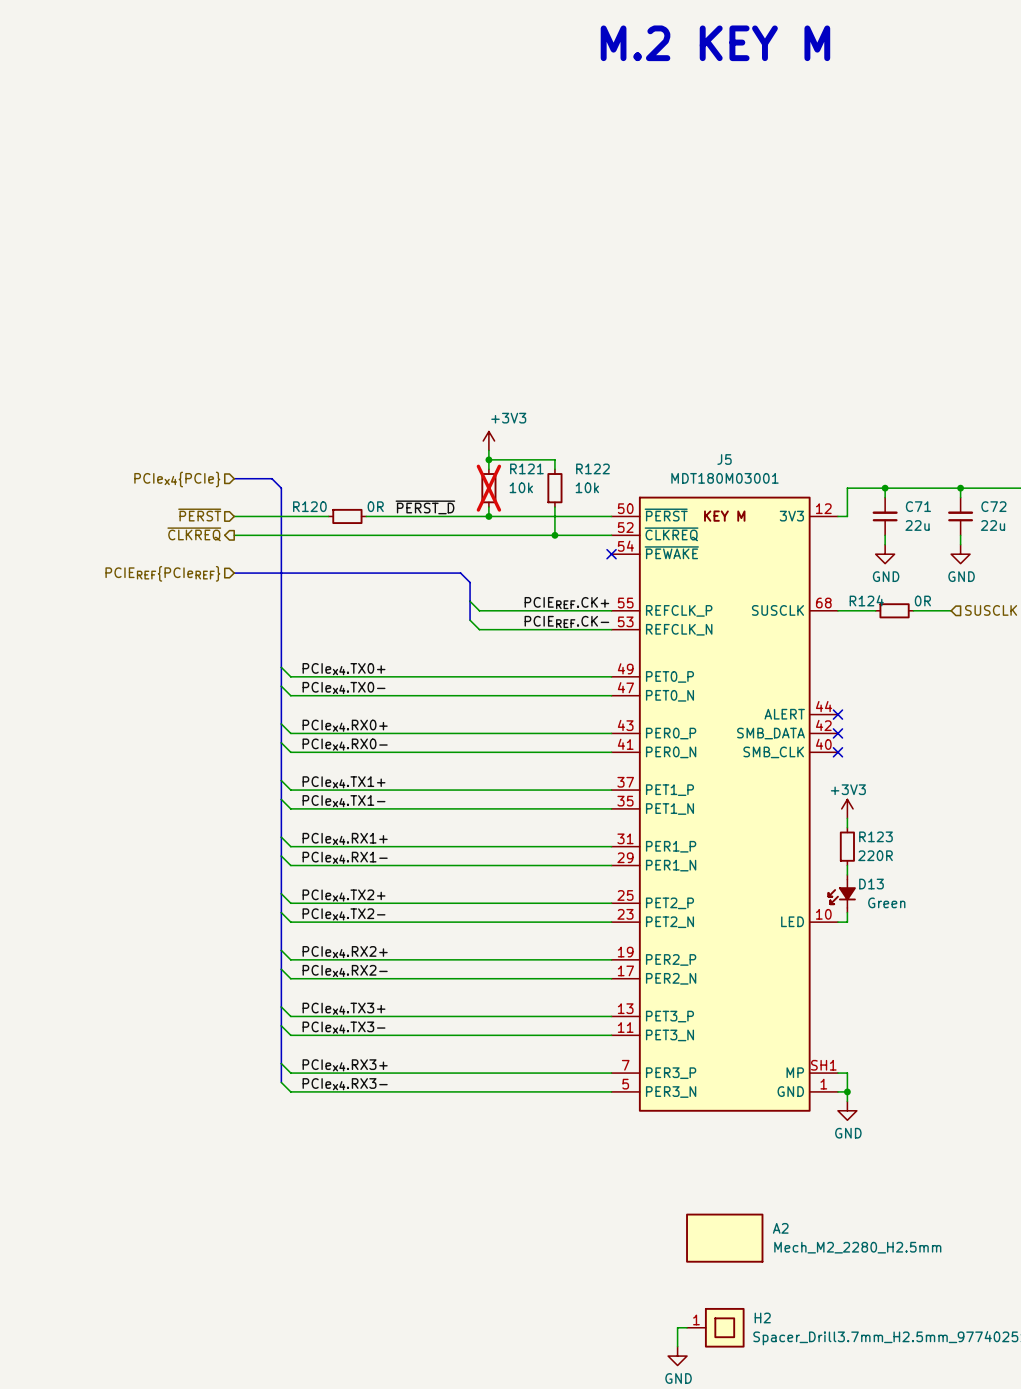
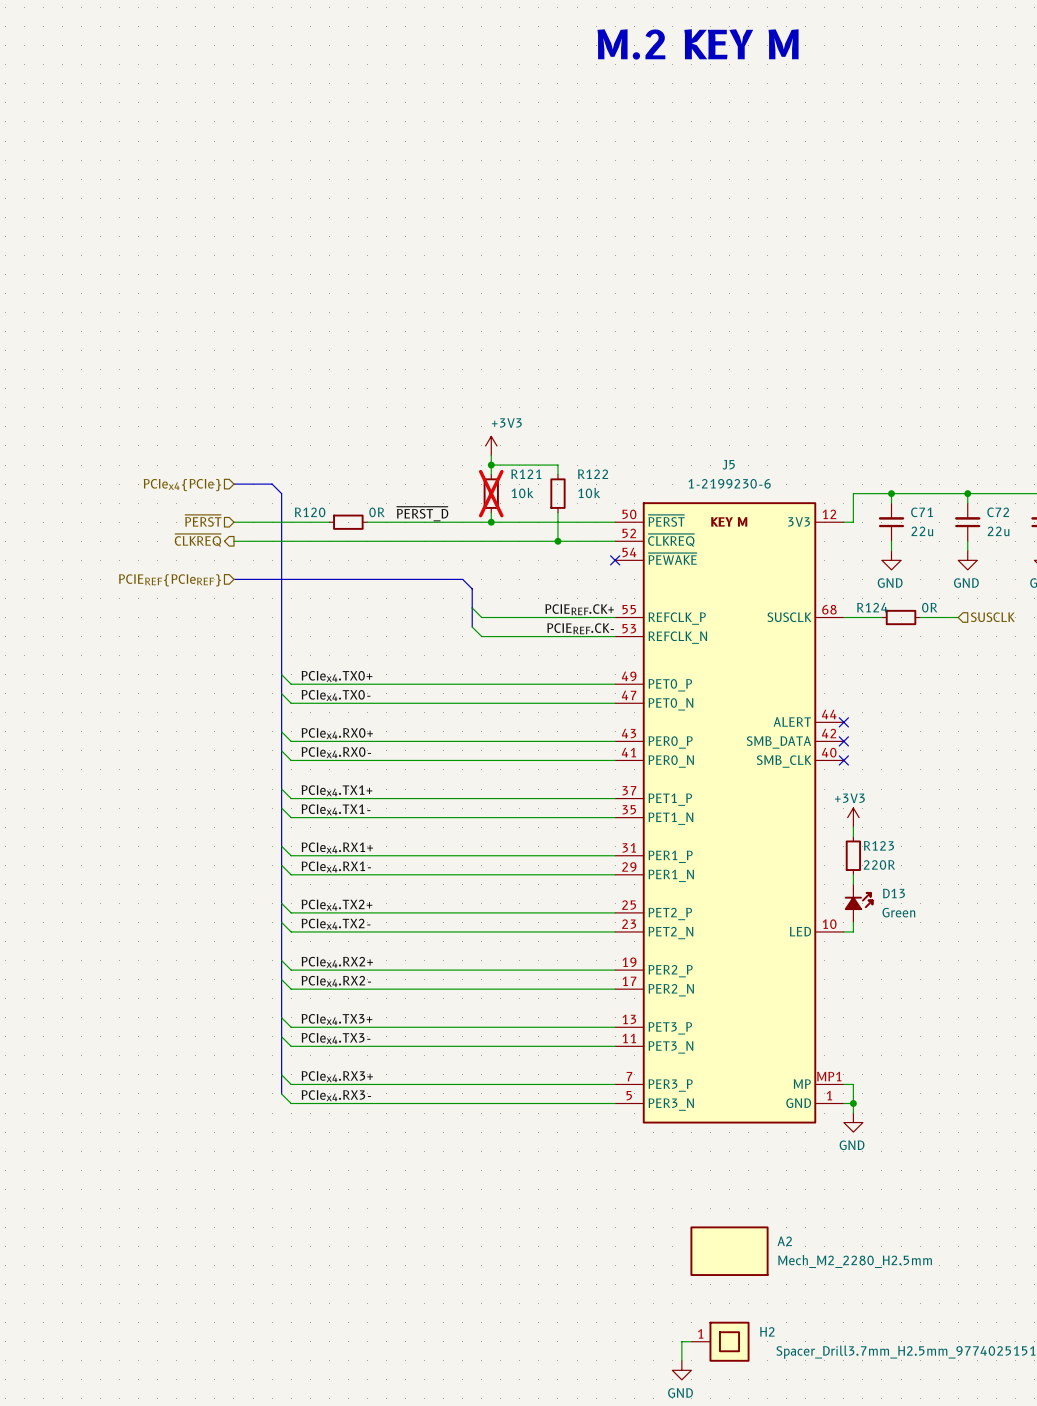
J5 text: MDT180M03001 (724, 478) -> 1-2199230-6 (729, 483)
D13 rotation: 0° (841, 893) -> 180° (859, 903)
J5 pin number: SH1 (823, 1065) -> MP1 (829, 1076)

